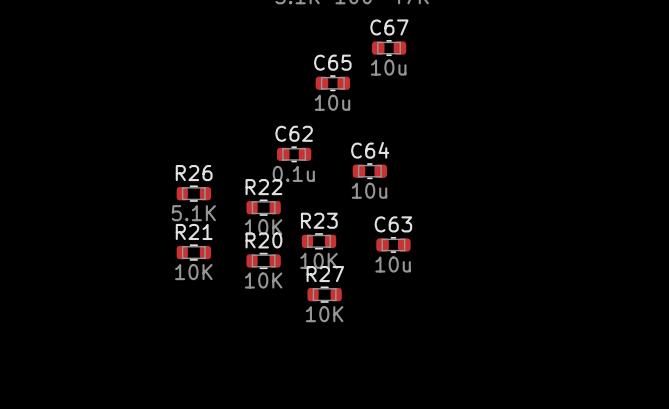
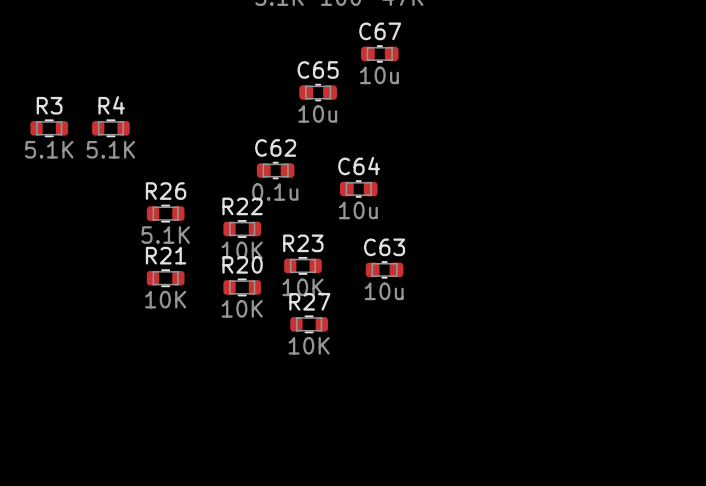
R3: none -> 5.1K (49, 128)
R4: none -> 5.1K (110, 128)

